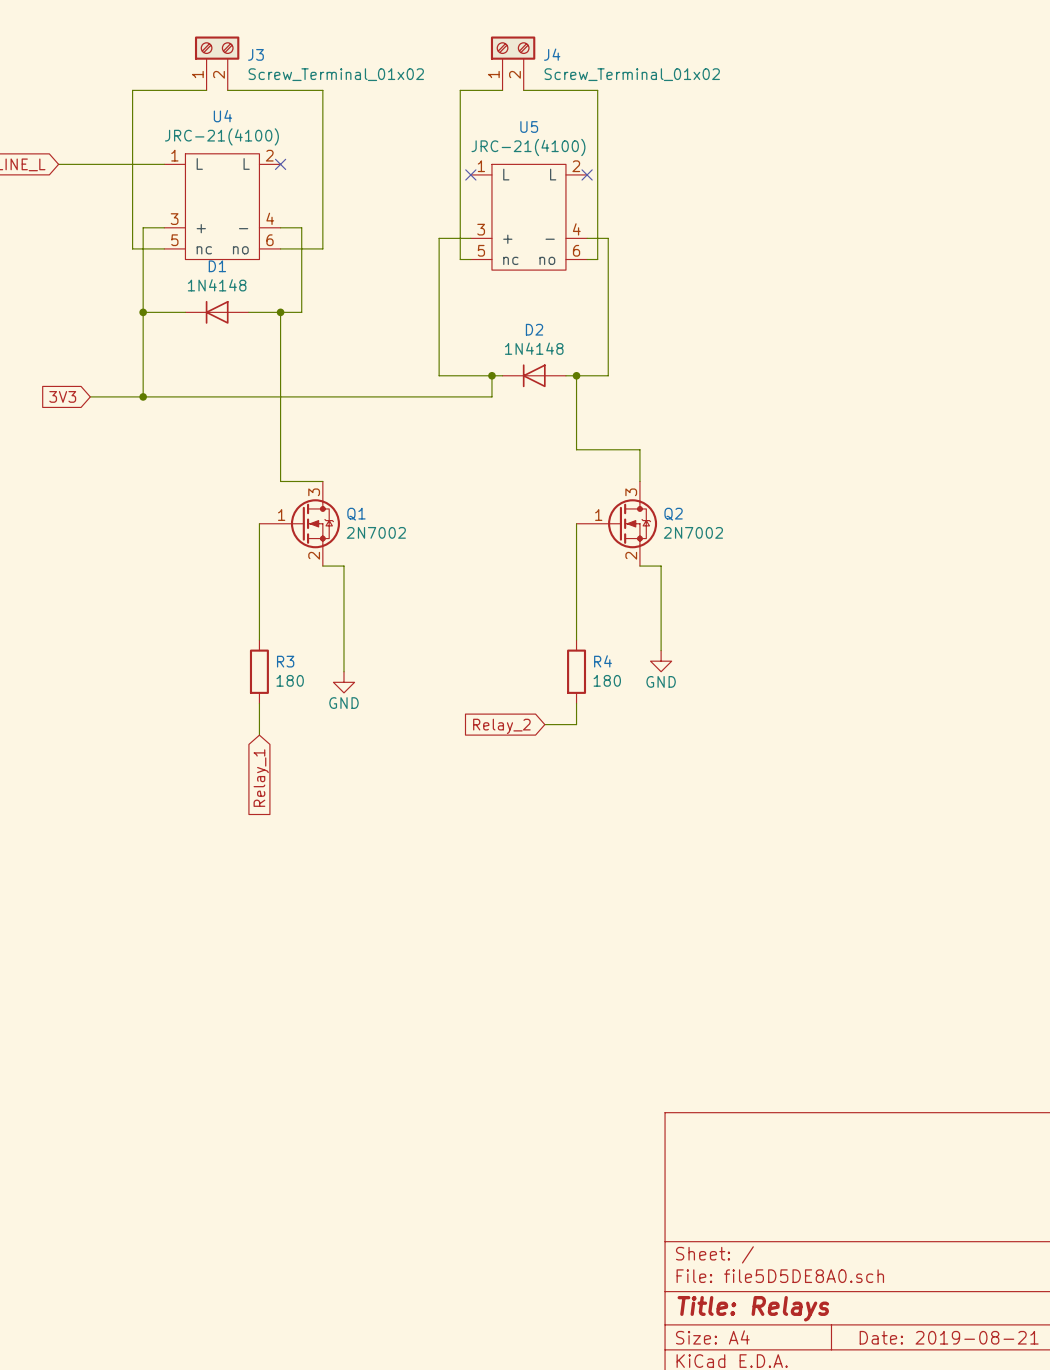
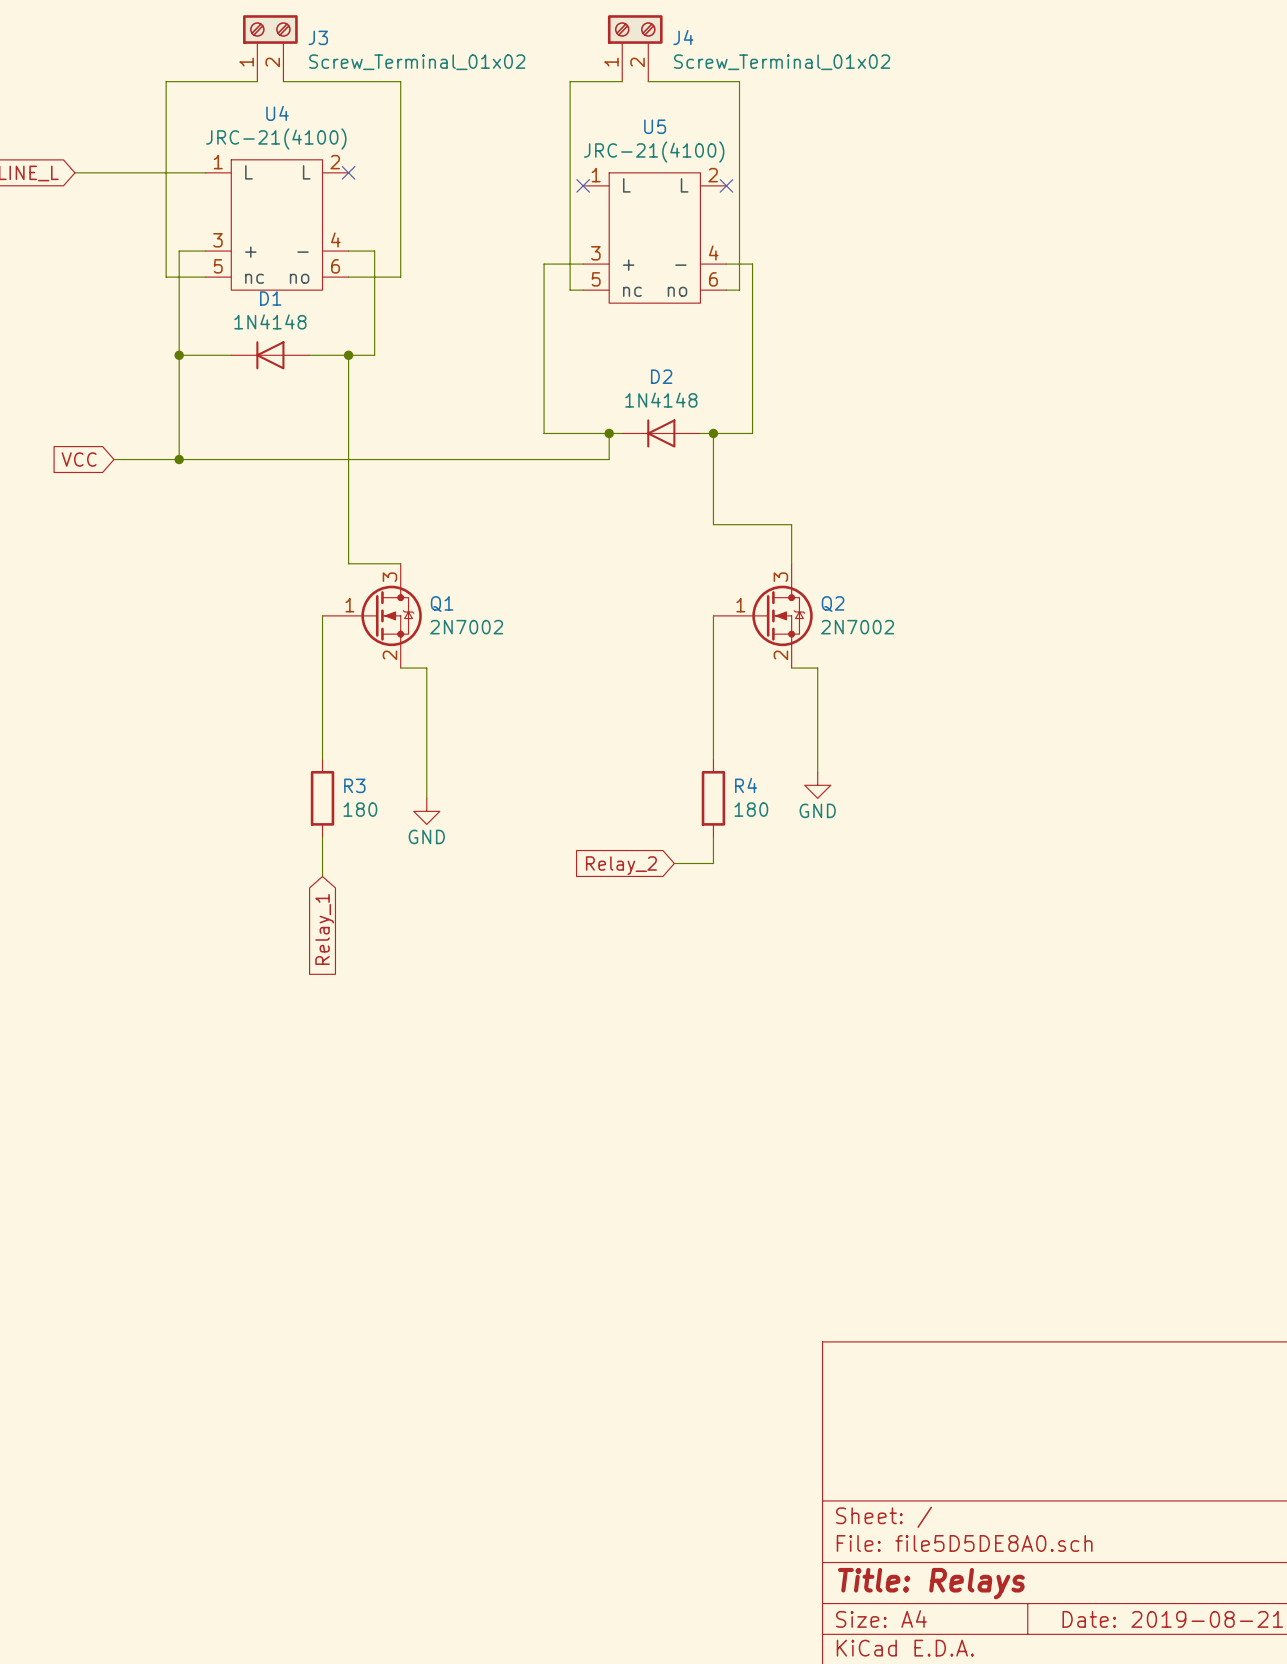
global label: 3V3 (62, 396) -> VCC (79, 459)

